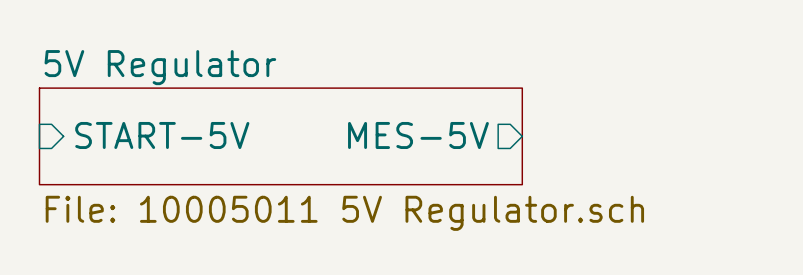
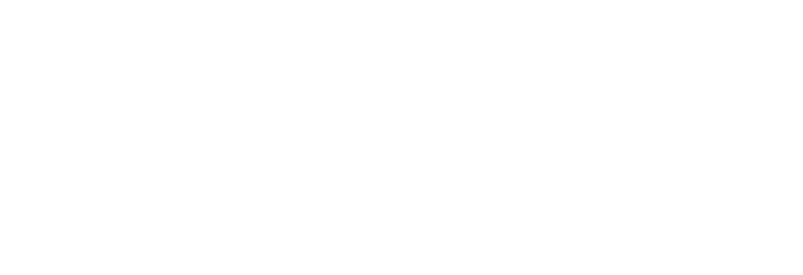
sheet pin: START-5V (162, 135) -> none
sheet pin: MES-5V (418, 135) -> none
sheet 5V Regulator: File: 10005011 5V Regulator.sch (280, 136) -> none

